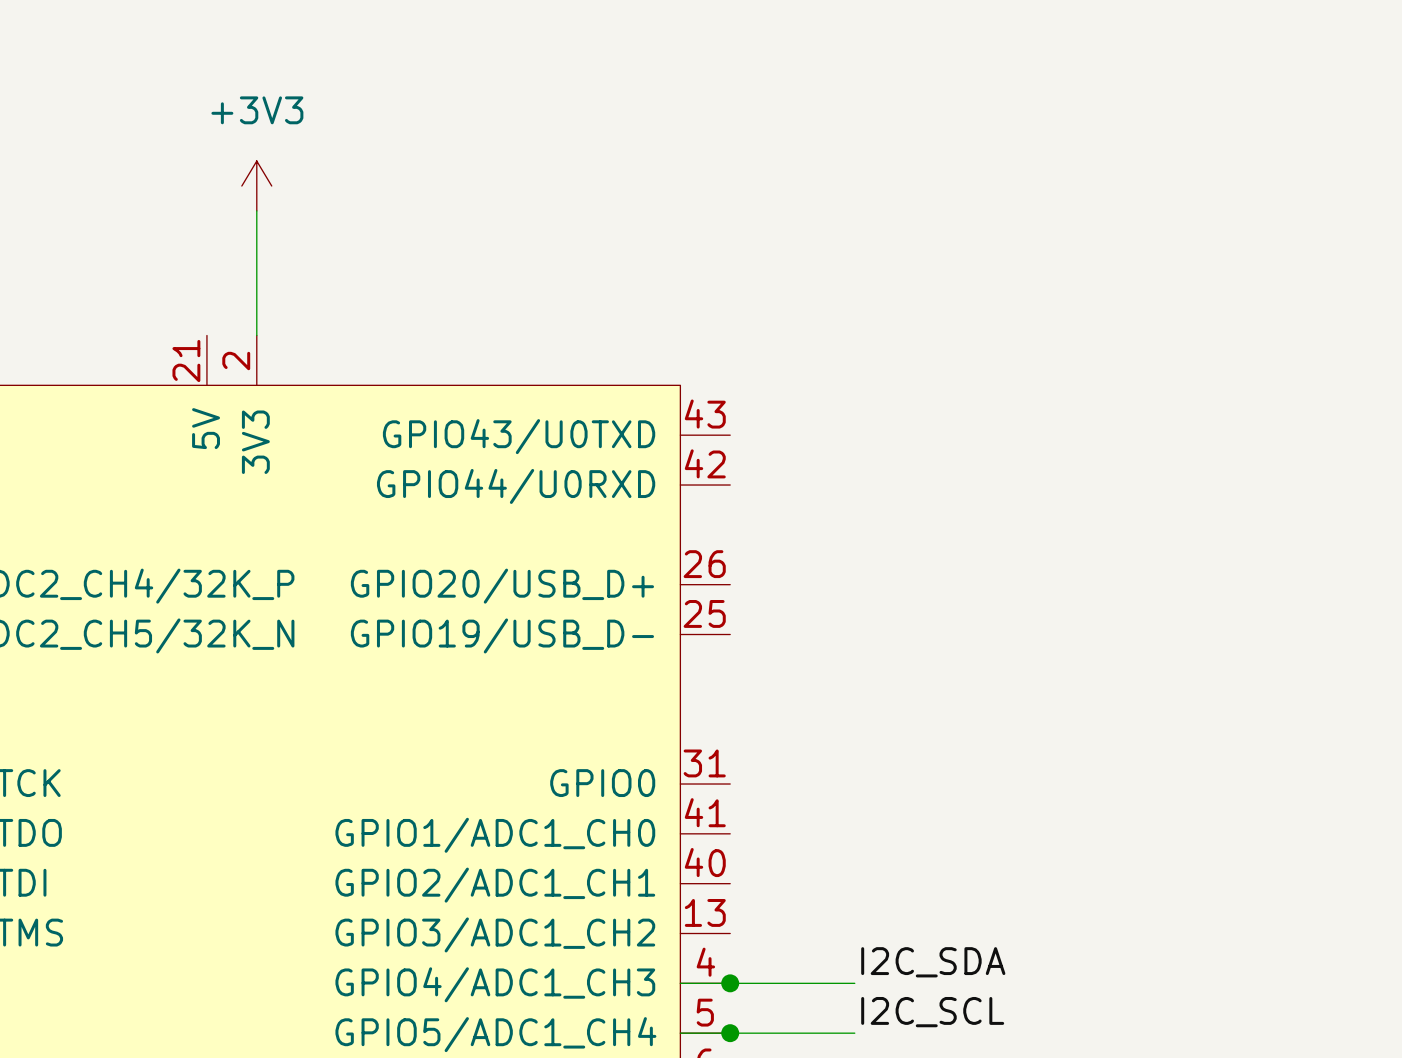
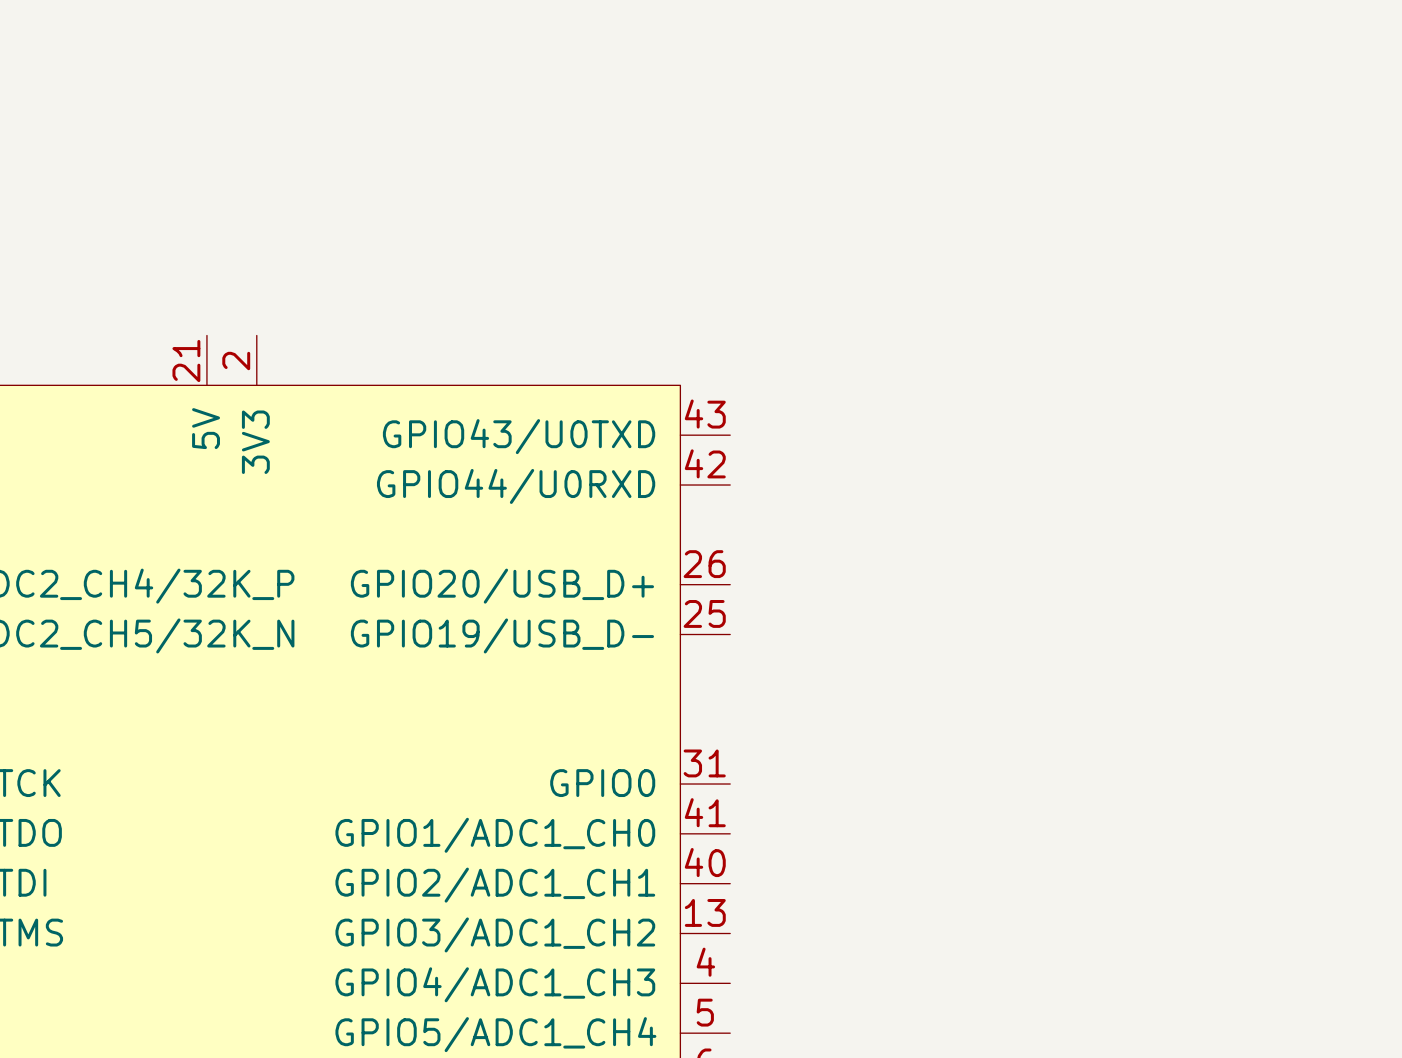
power symbol: +3V3 (256, 186) -> none
wire: (256, 210) (256, 335) -> none
label: I2C_SDA (933, 962) -> none
wire: (680, 983) (854, 983) -> none
junction: (730, 983) -> none
label: I2C_SCL (932, 1012) -> none
wire: (680, 1033) (854, 1033) -> none
junction: (730, 1033) -> none

